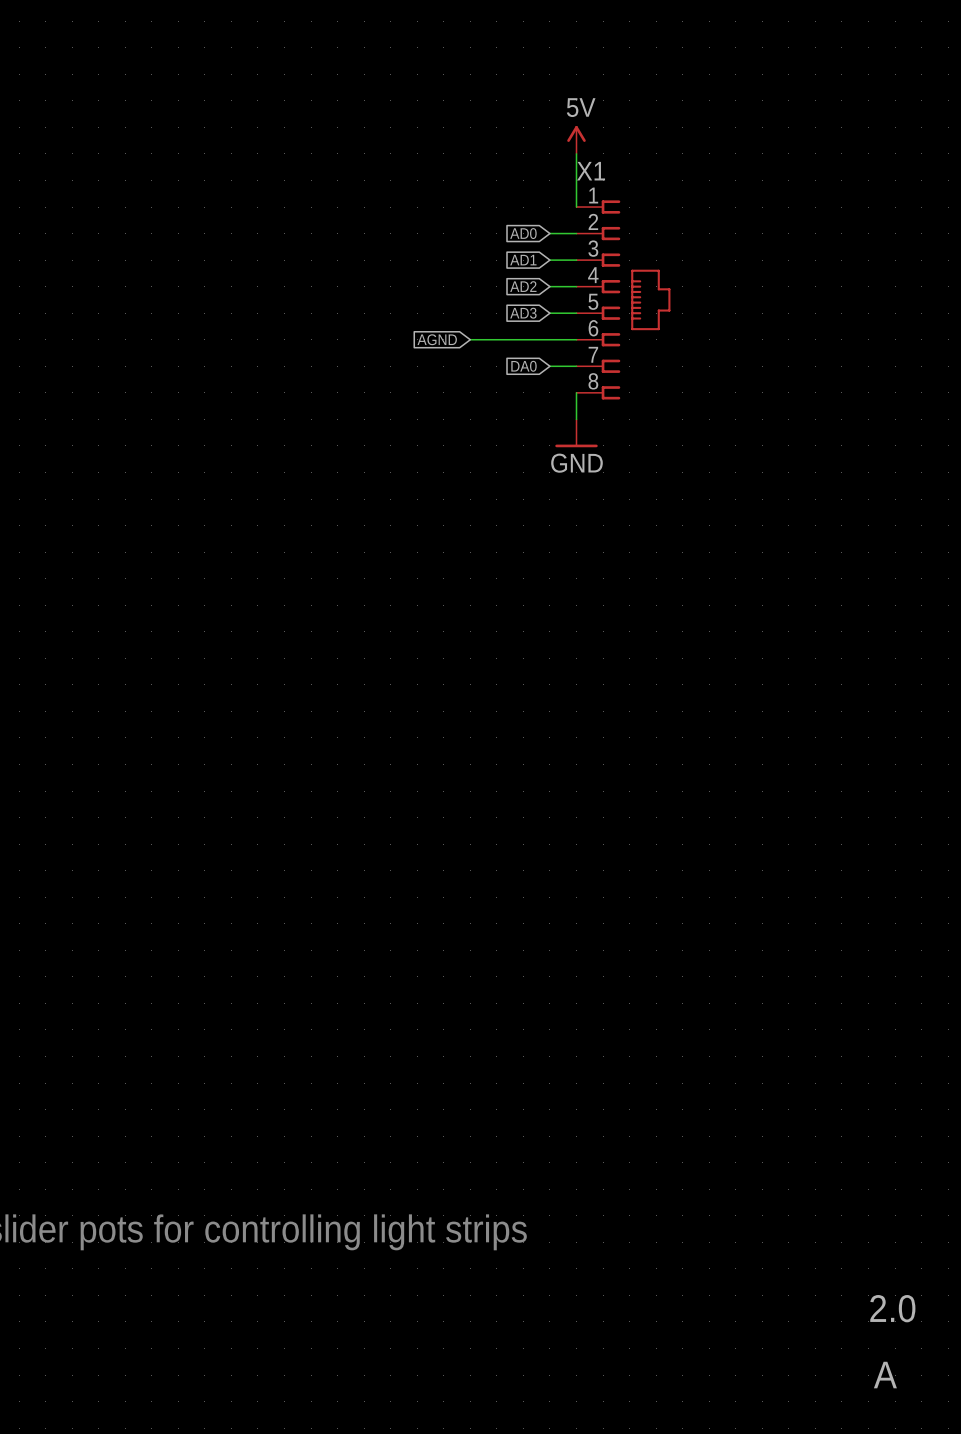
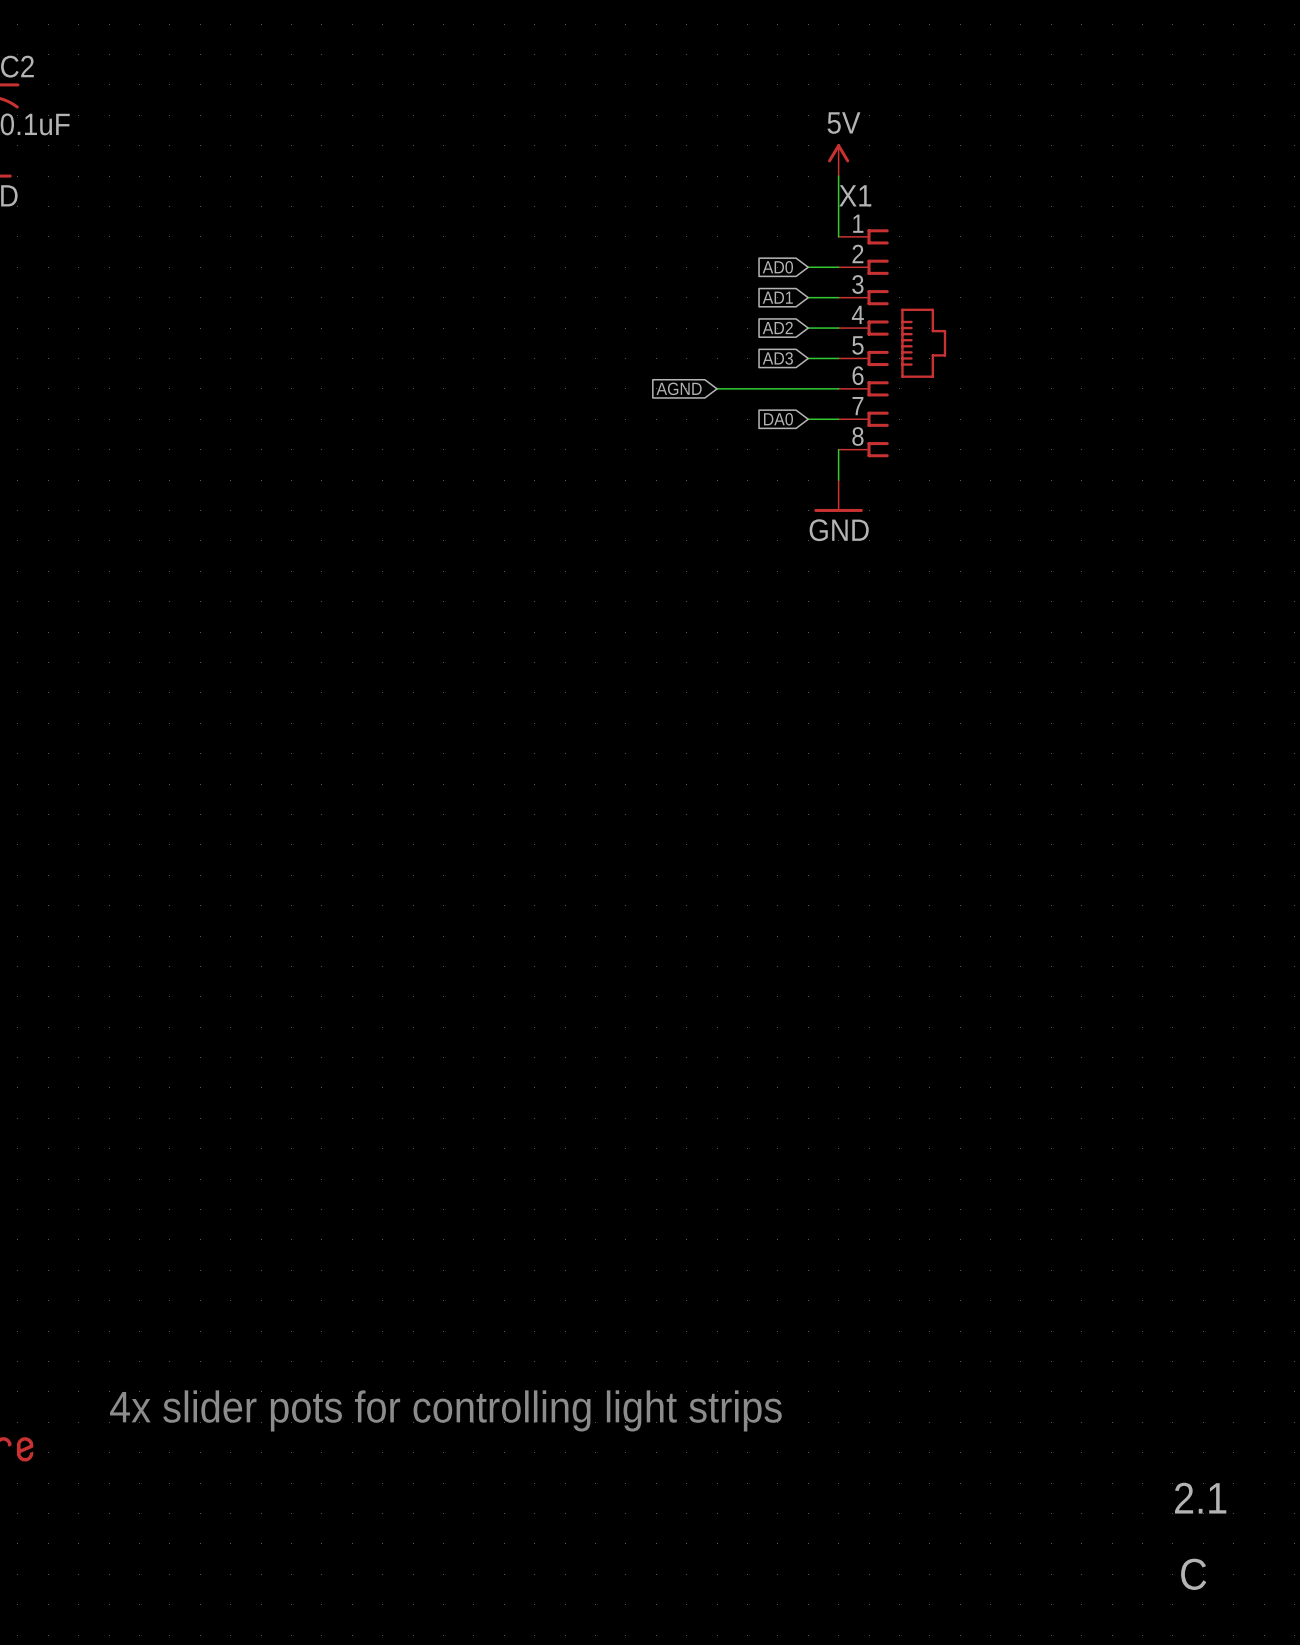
text: 2.0 (892, 1308) -> 2.1 (1200, 1498)
text: A (885, 1375) -> C (1193, 1574)

